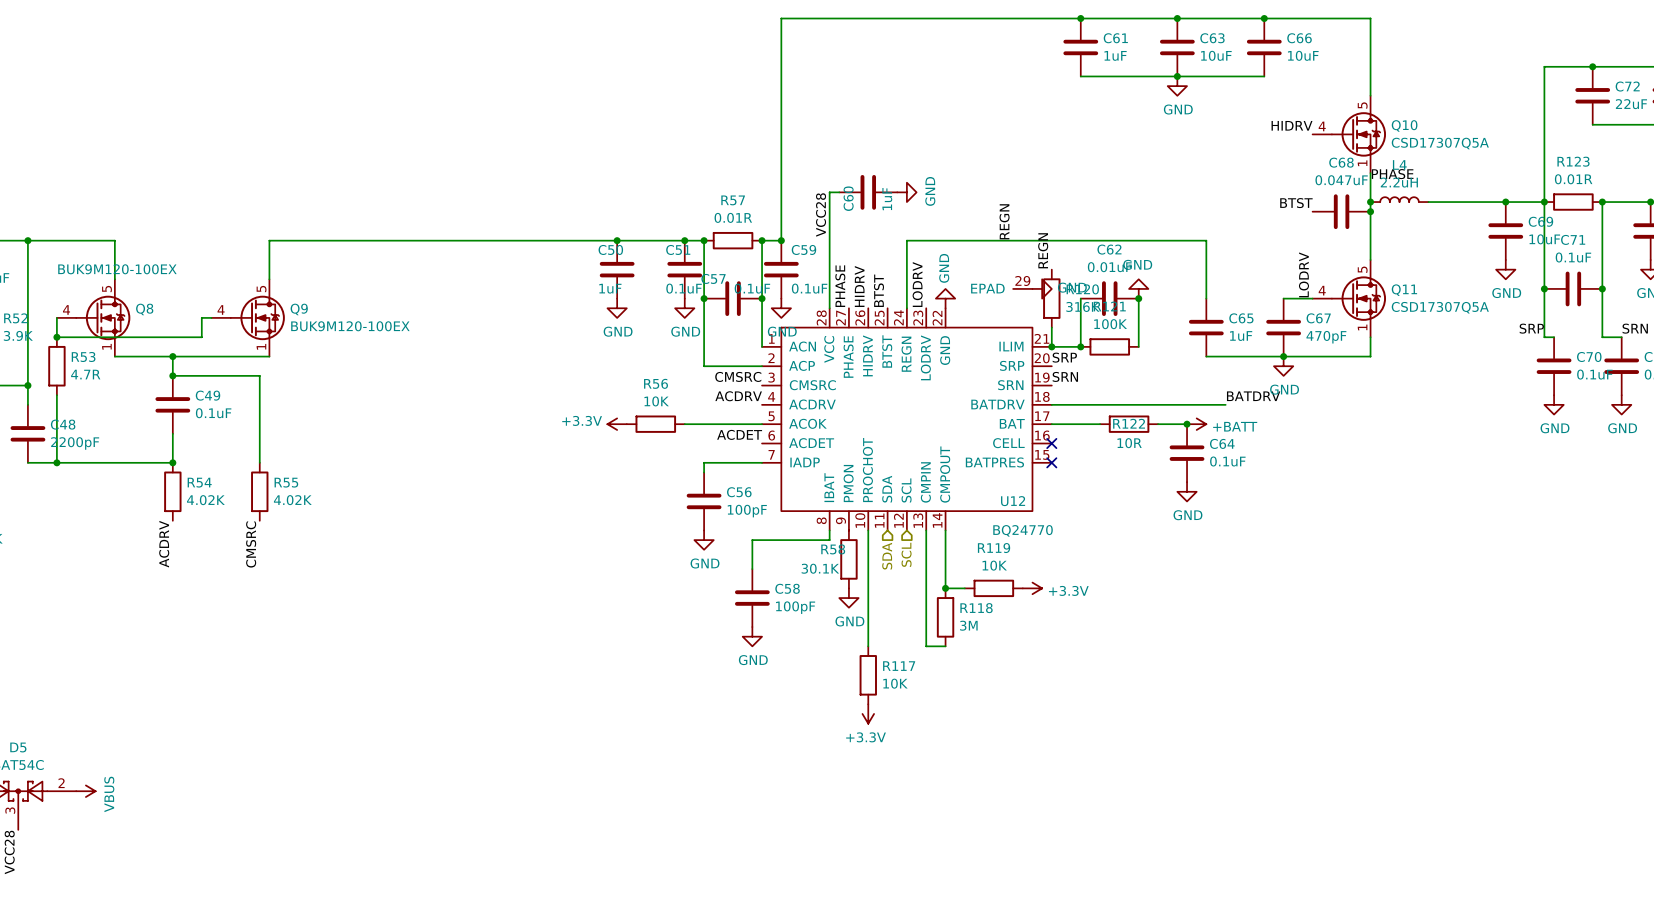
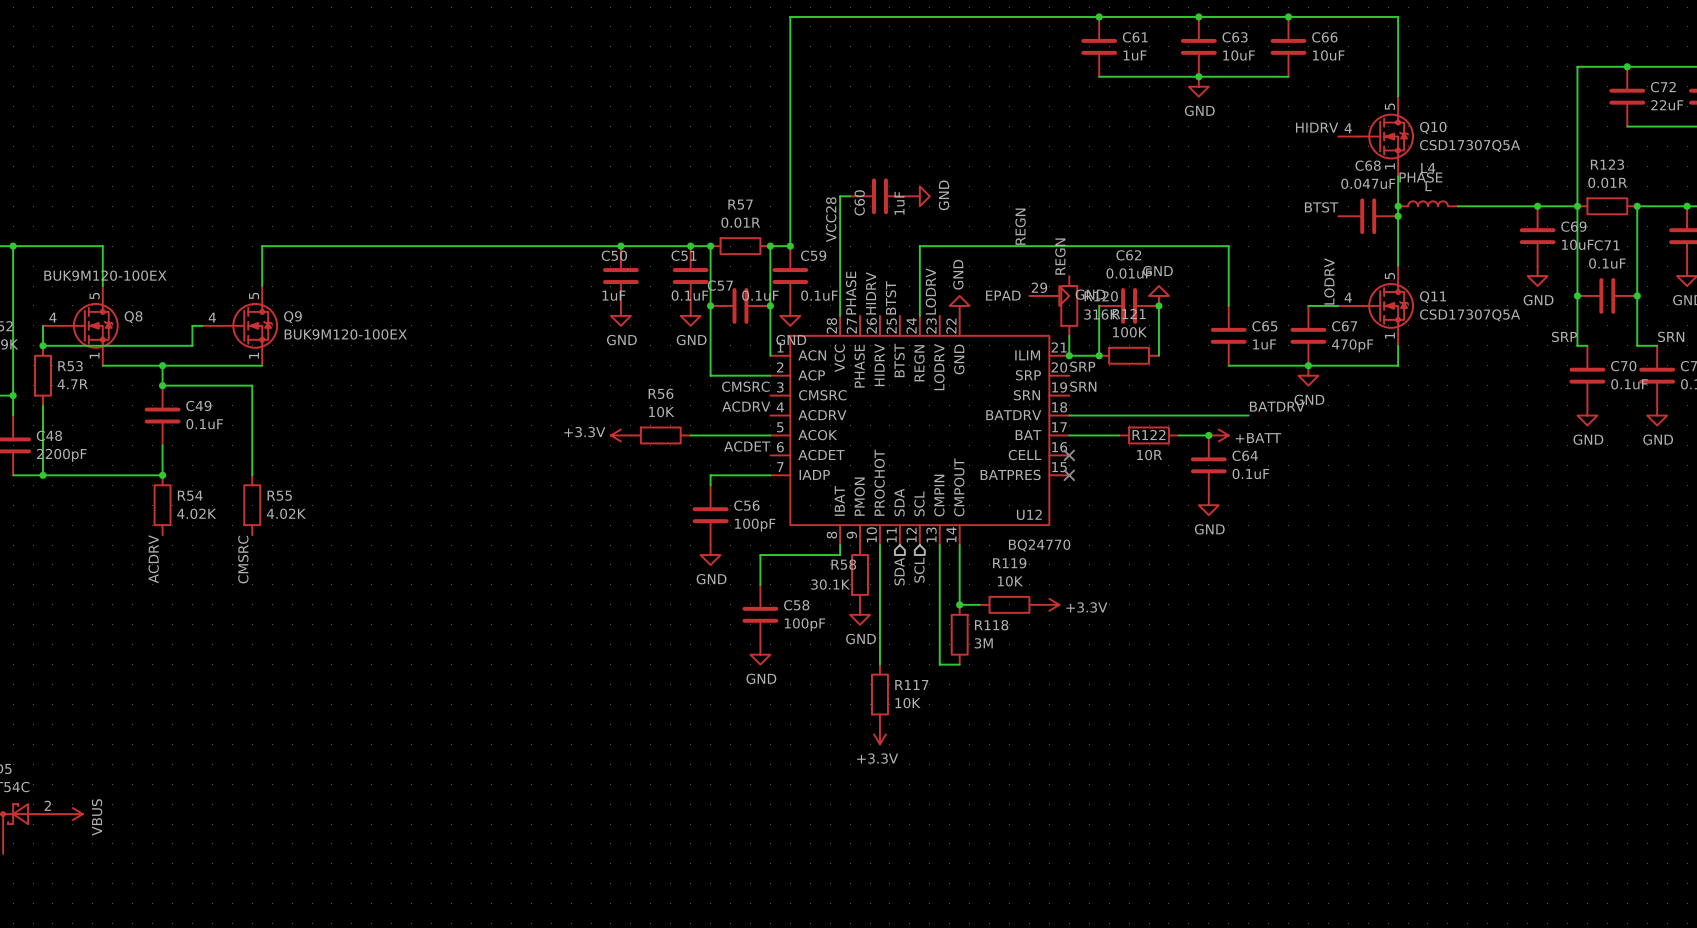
L4 value: 2.2uH (1399, 182) -> L (1428, 186)

